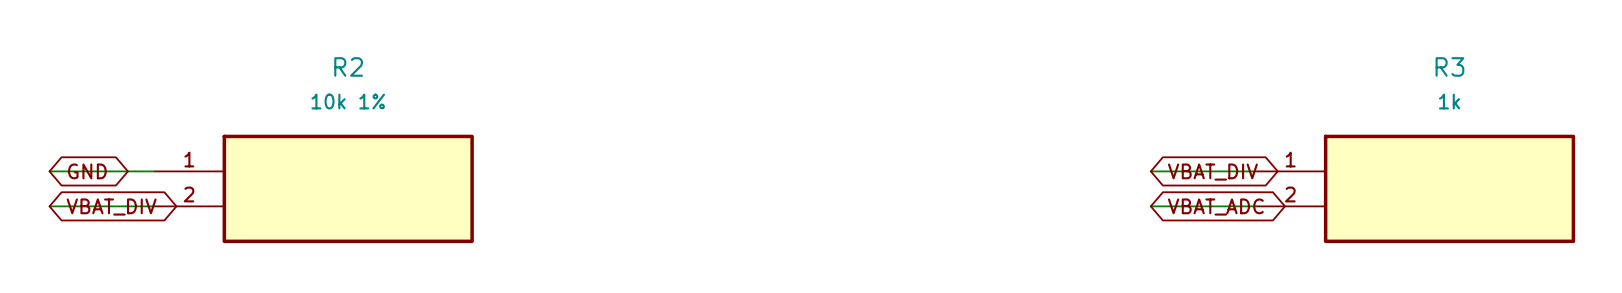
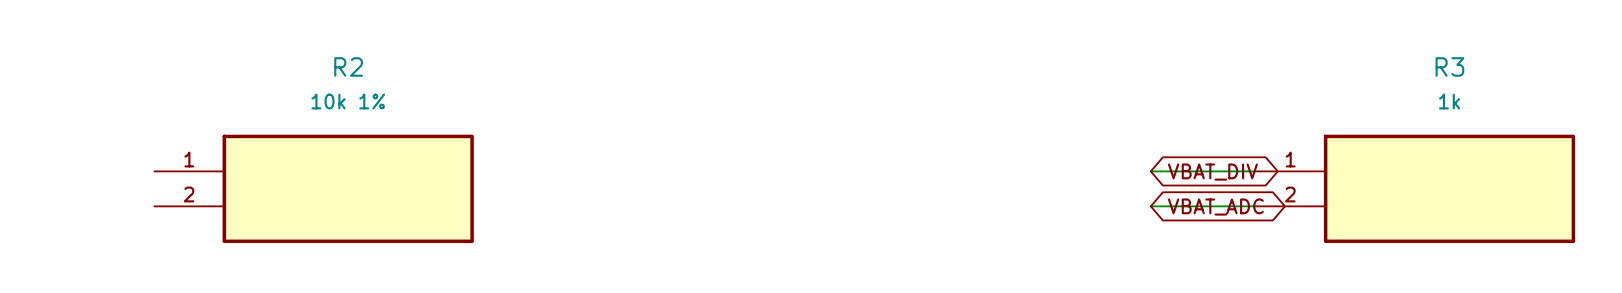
wire: (49, 171) (154, 171) -> none
global label: GND (87, 171) -> none
wire: (49, 206) (154, 206) -> none
global label: VBAT_DIV (111, 207) -> none

